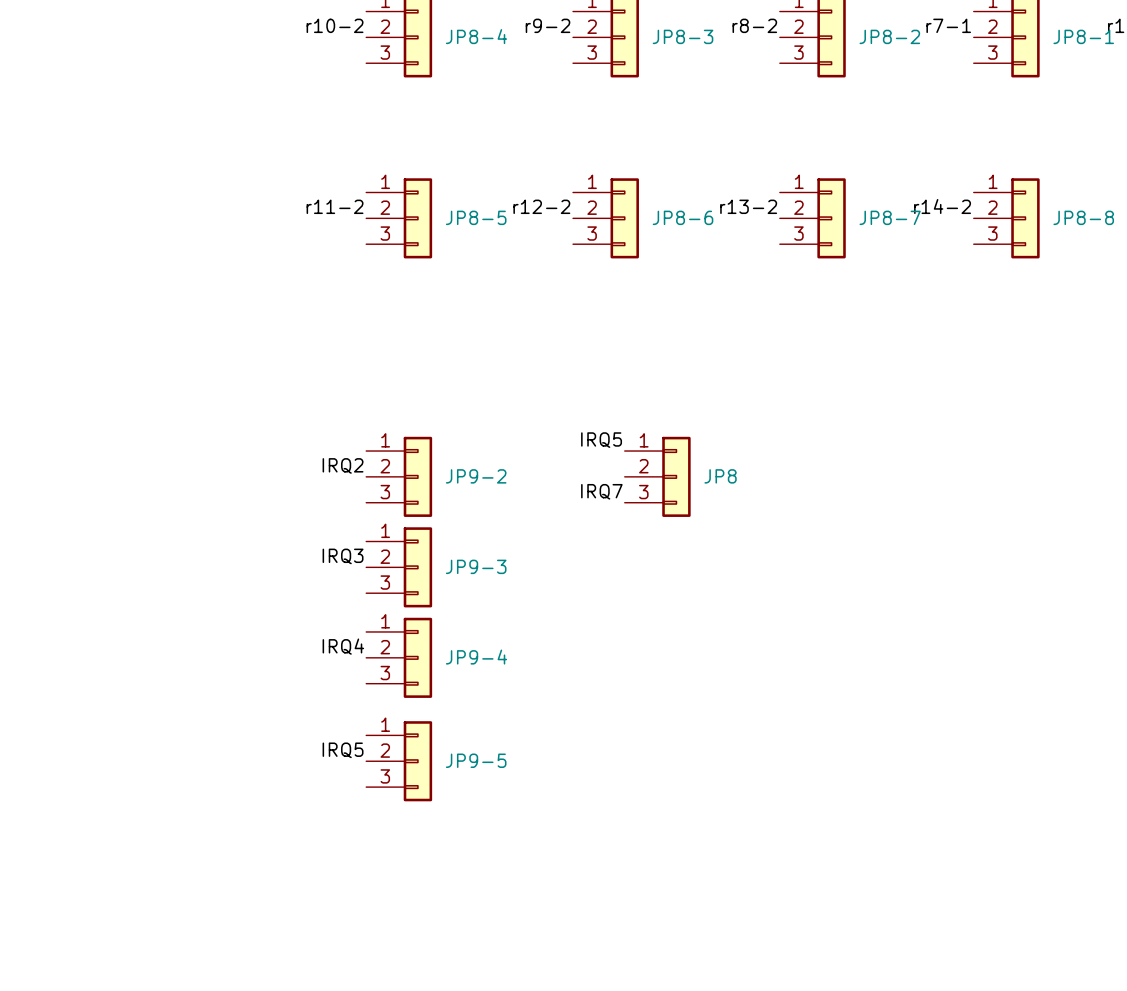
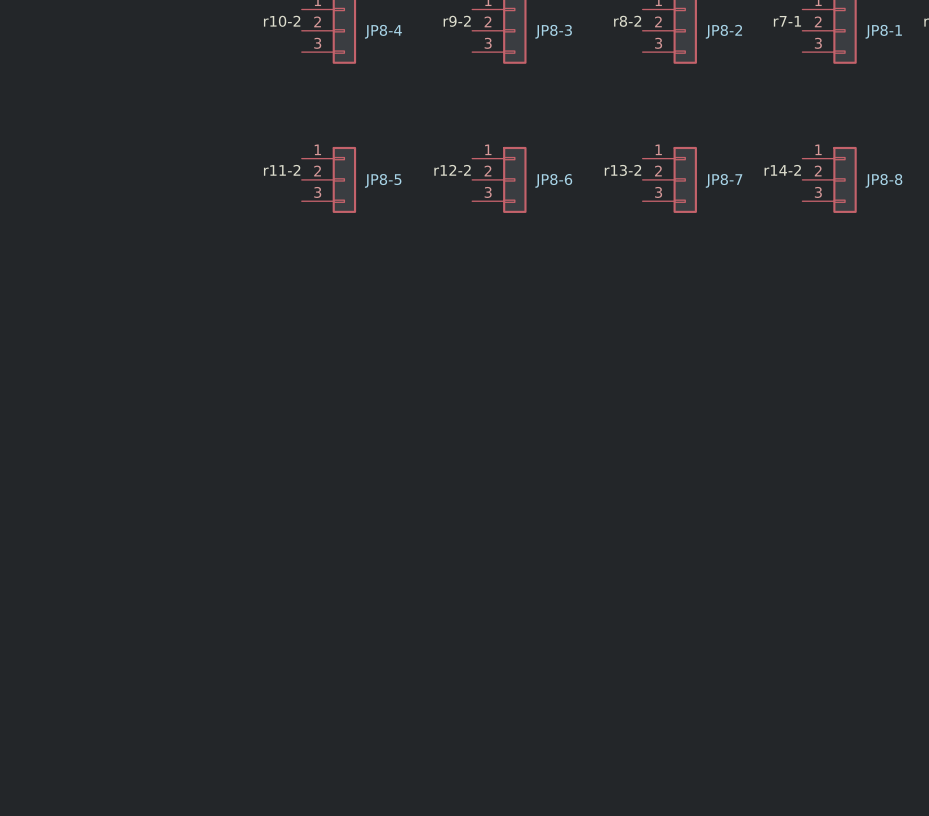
label: IRQ5 (601, 440) -> none
label: IRQ2 (343, 465) -> none
JP9-2: (399, 476) -> none
JP8: (657, 476) -> none
label: IRQ7 (601, 491) -> none
label: IRQ3 (343, 556) -> none
JP9-3: (399, 567) -> none
label: IRQ4 (343, 646) -> none
JP9-4: (399, 657) -> none
label: IRQ5 (343, 750) -> none
JP9-5: (399, 761) -> none

